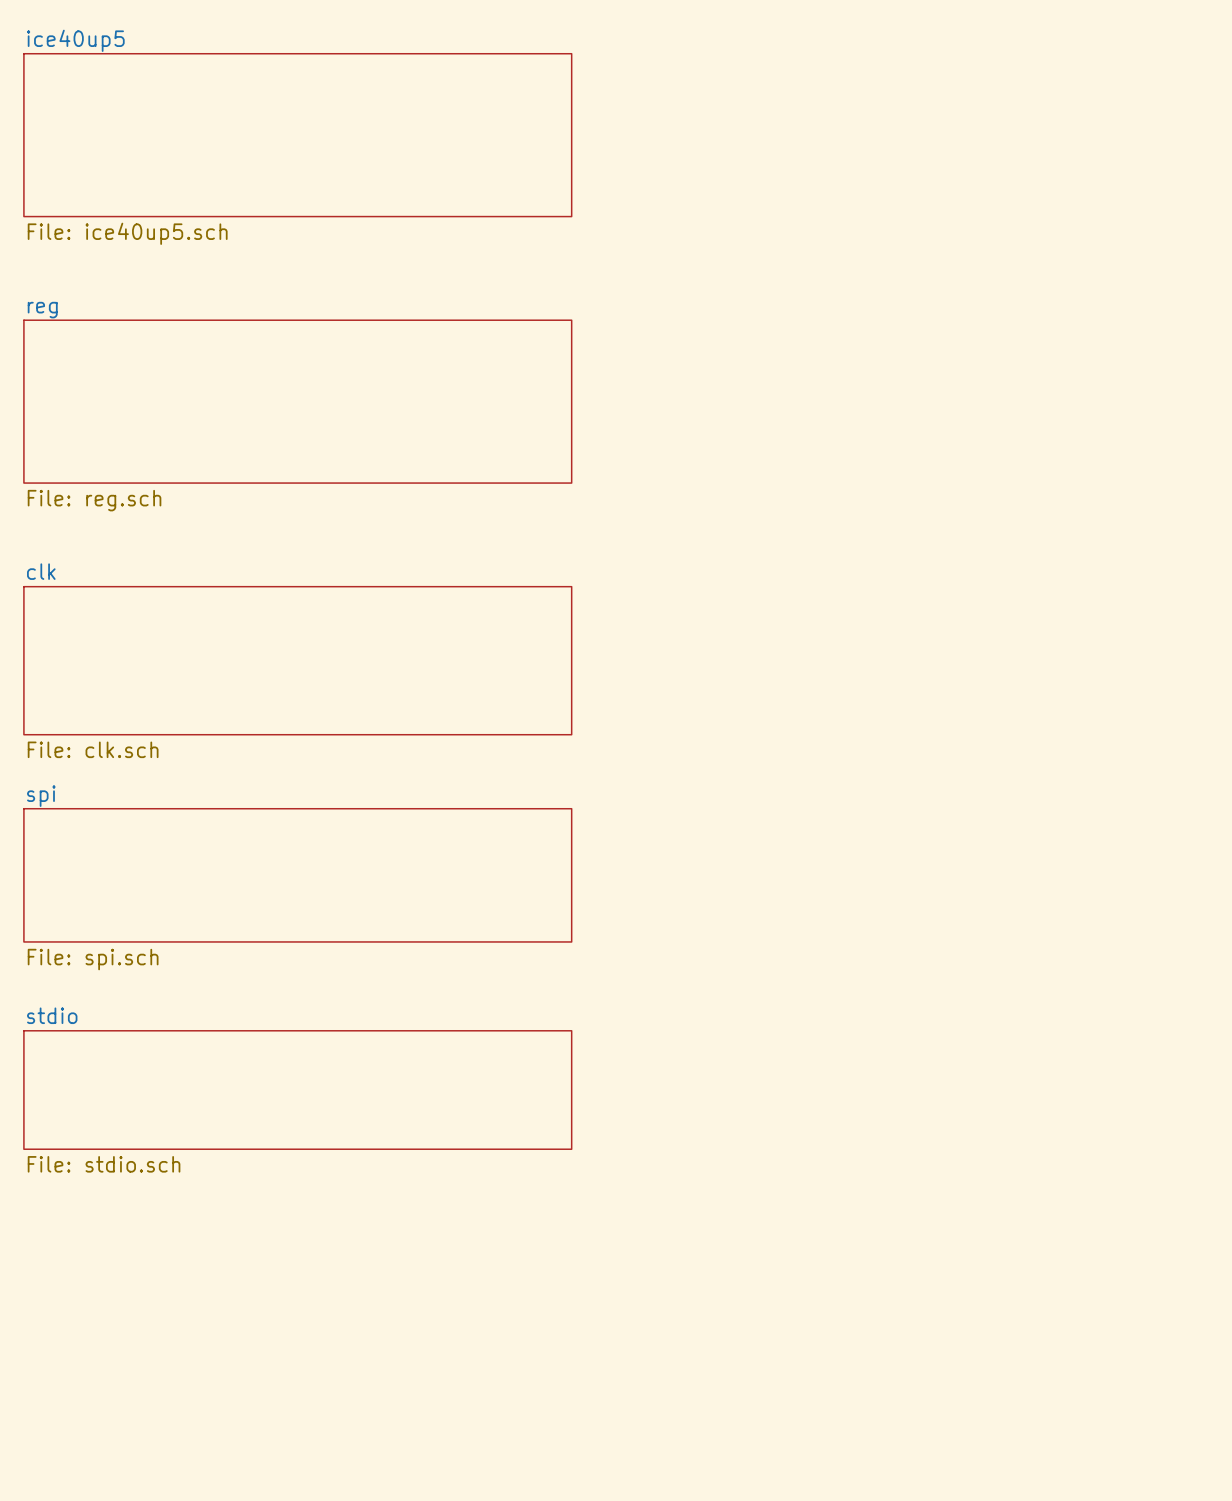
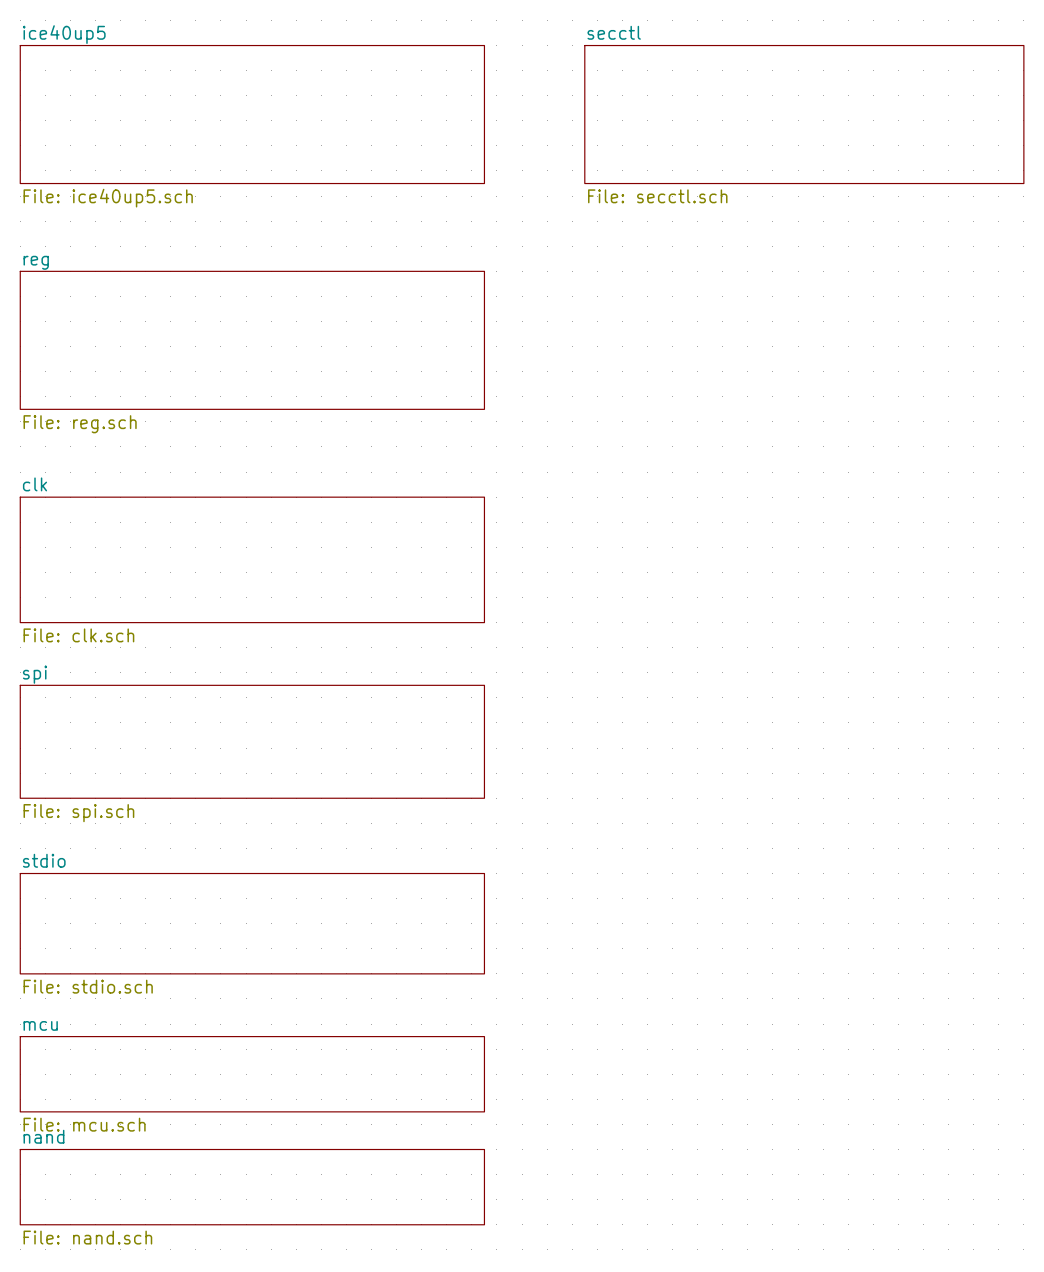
sheet secctl: none -> File: secctl.sch (804, 114)
sheet mcu: none -> File: mcu.sch (252, 1074)
sheet nand: none -> File: nand.sch (252, 1187)

